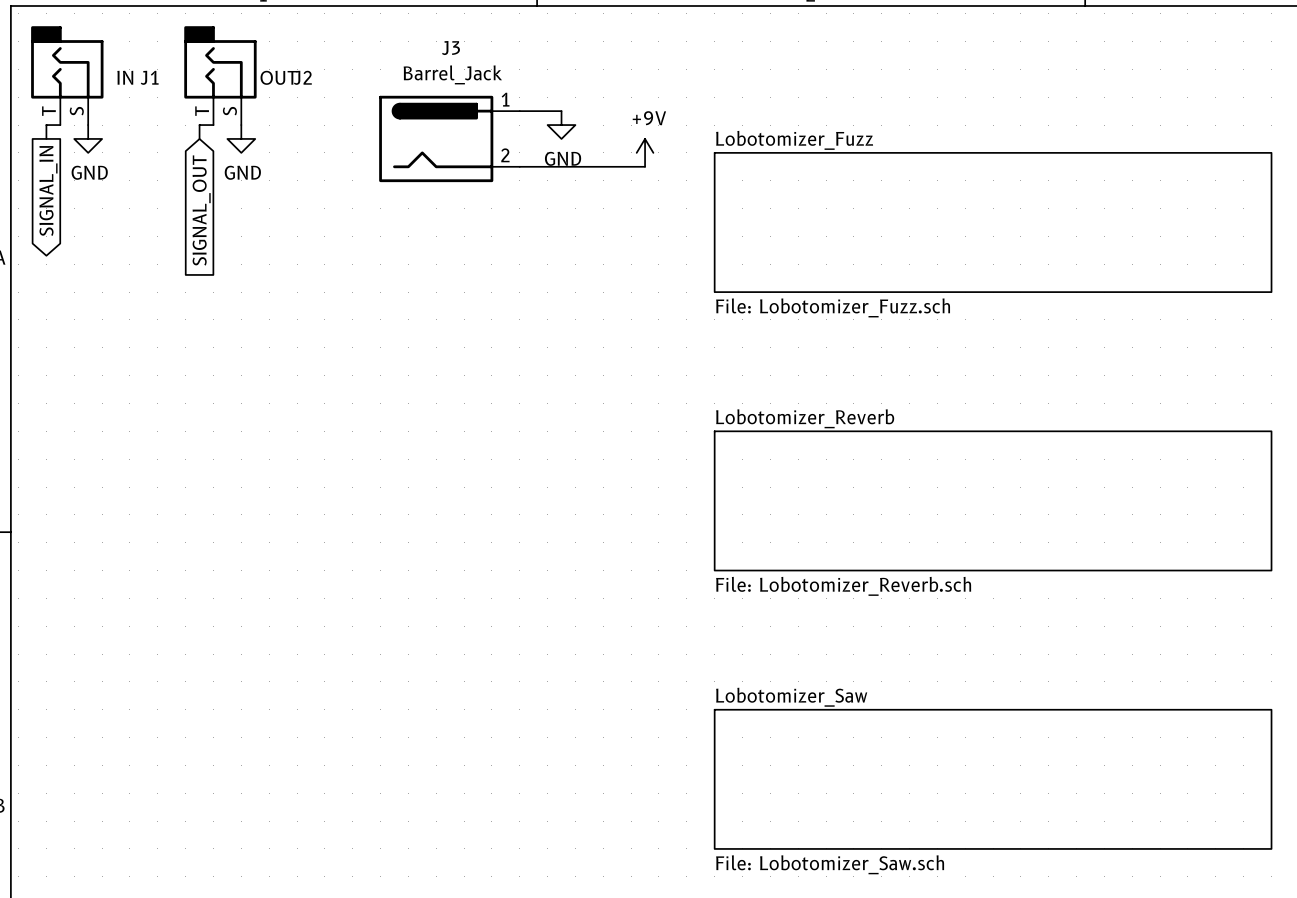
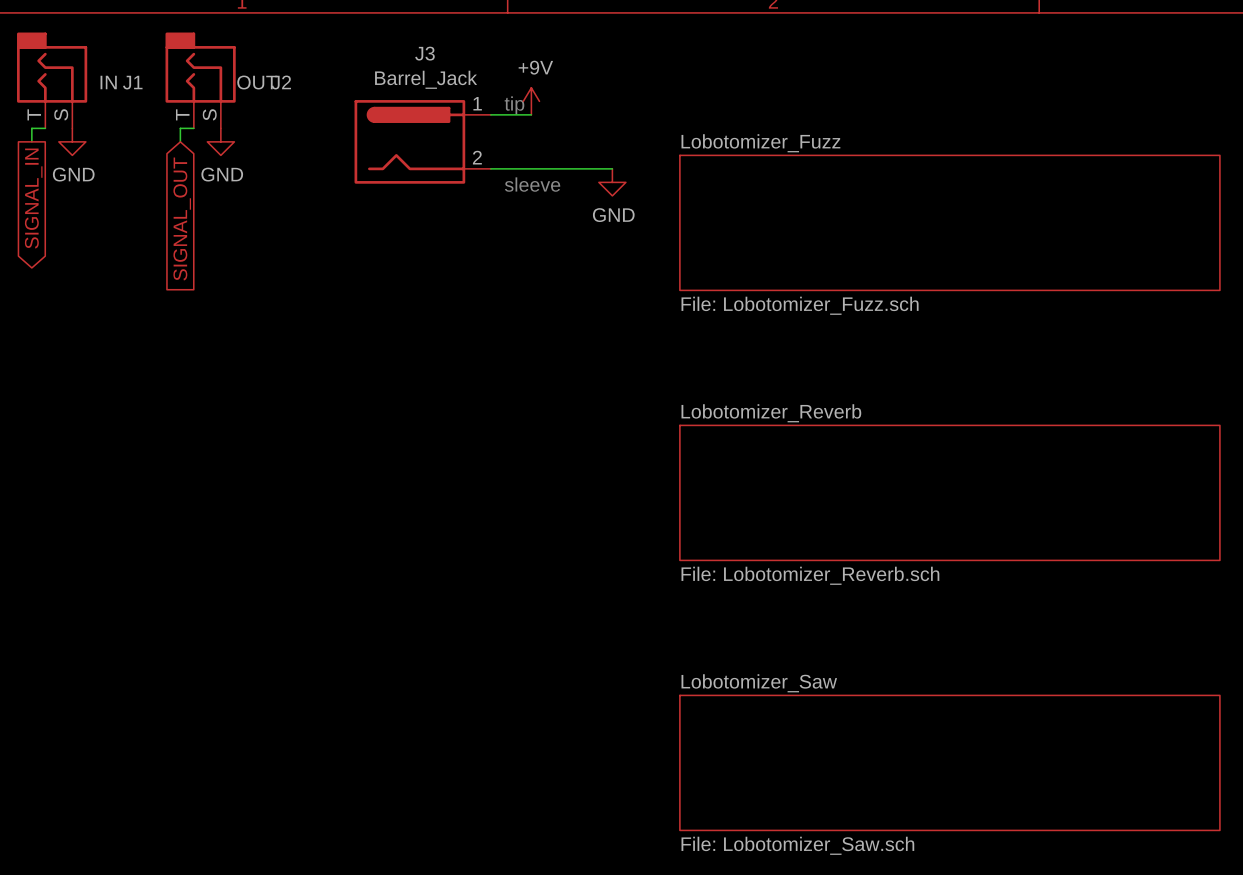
text: none -> tip (514, 105)
power symbol position: GND (561, 125) -> GND (612, 182)
power symbol position: +9V (645, 152) -> +9V (531, 101)
text: none -> sleeve (532, 184)

